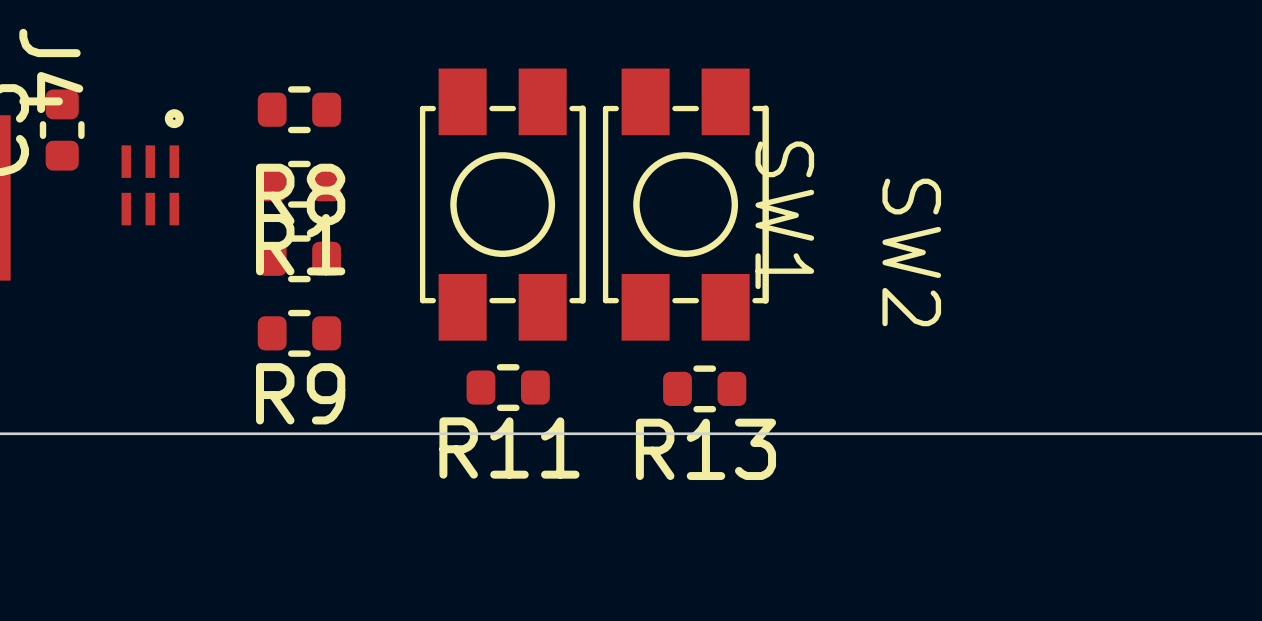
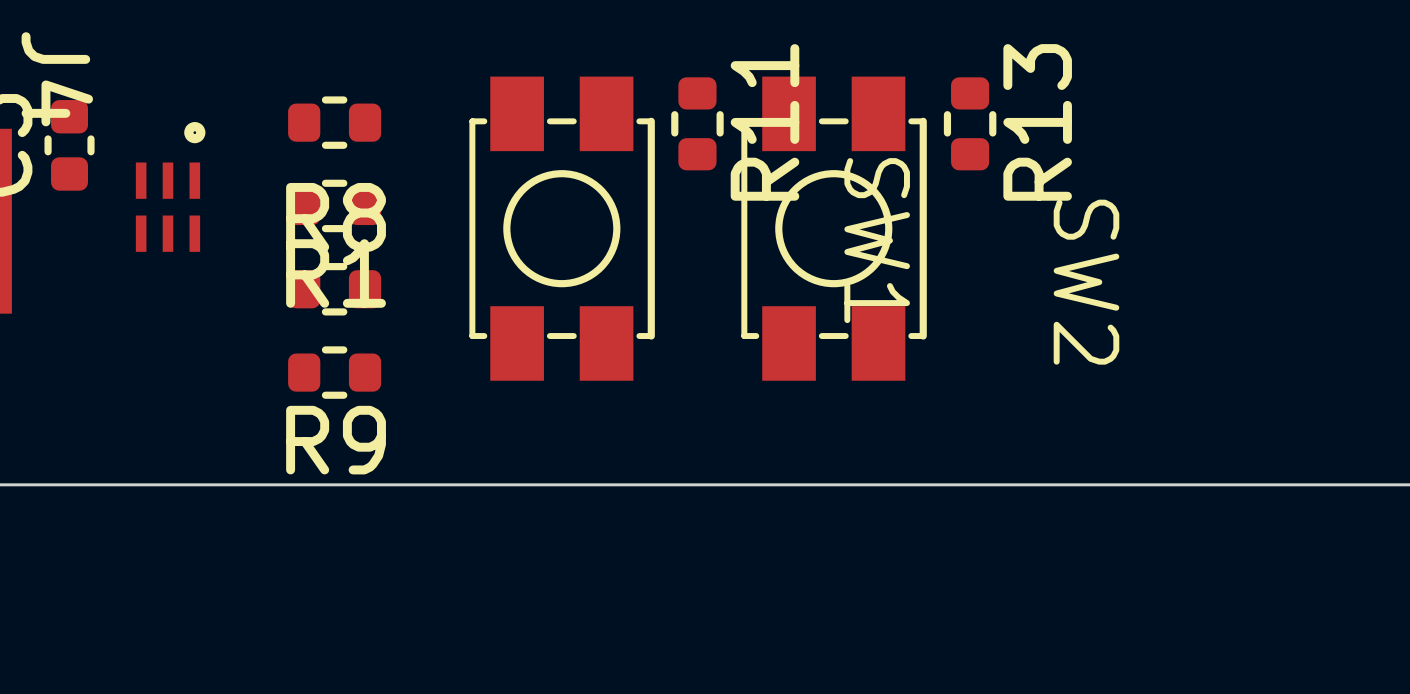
SW2 position: (685, 204) -> (834, 228)
R11 rotation: 0° (508, 387) -> 90° clockwise (697, 123)
R11 position: (508, 387) -> (697, 123)
R13 rotation: 0° (704, 388) -> 90° clockwise (970, 123)
R13 position: (704, 388) -> (970, 123)

